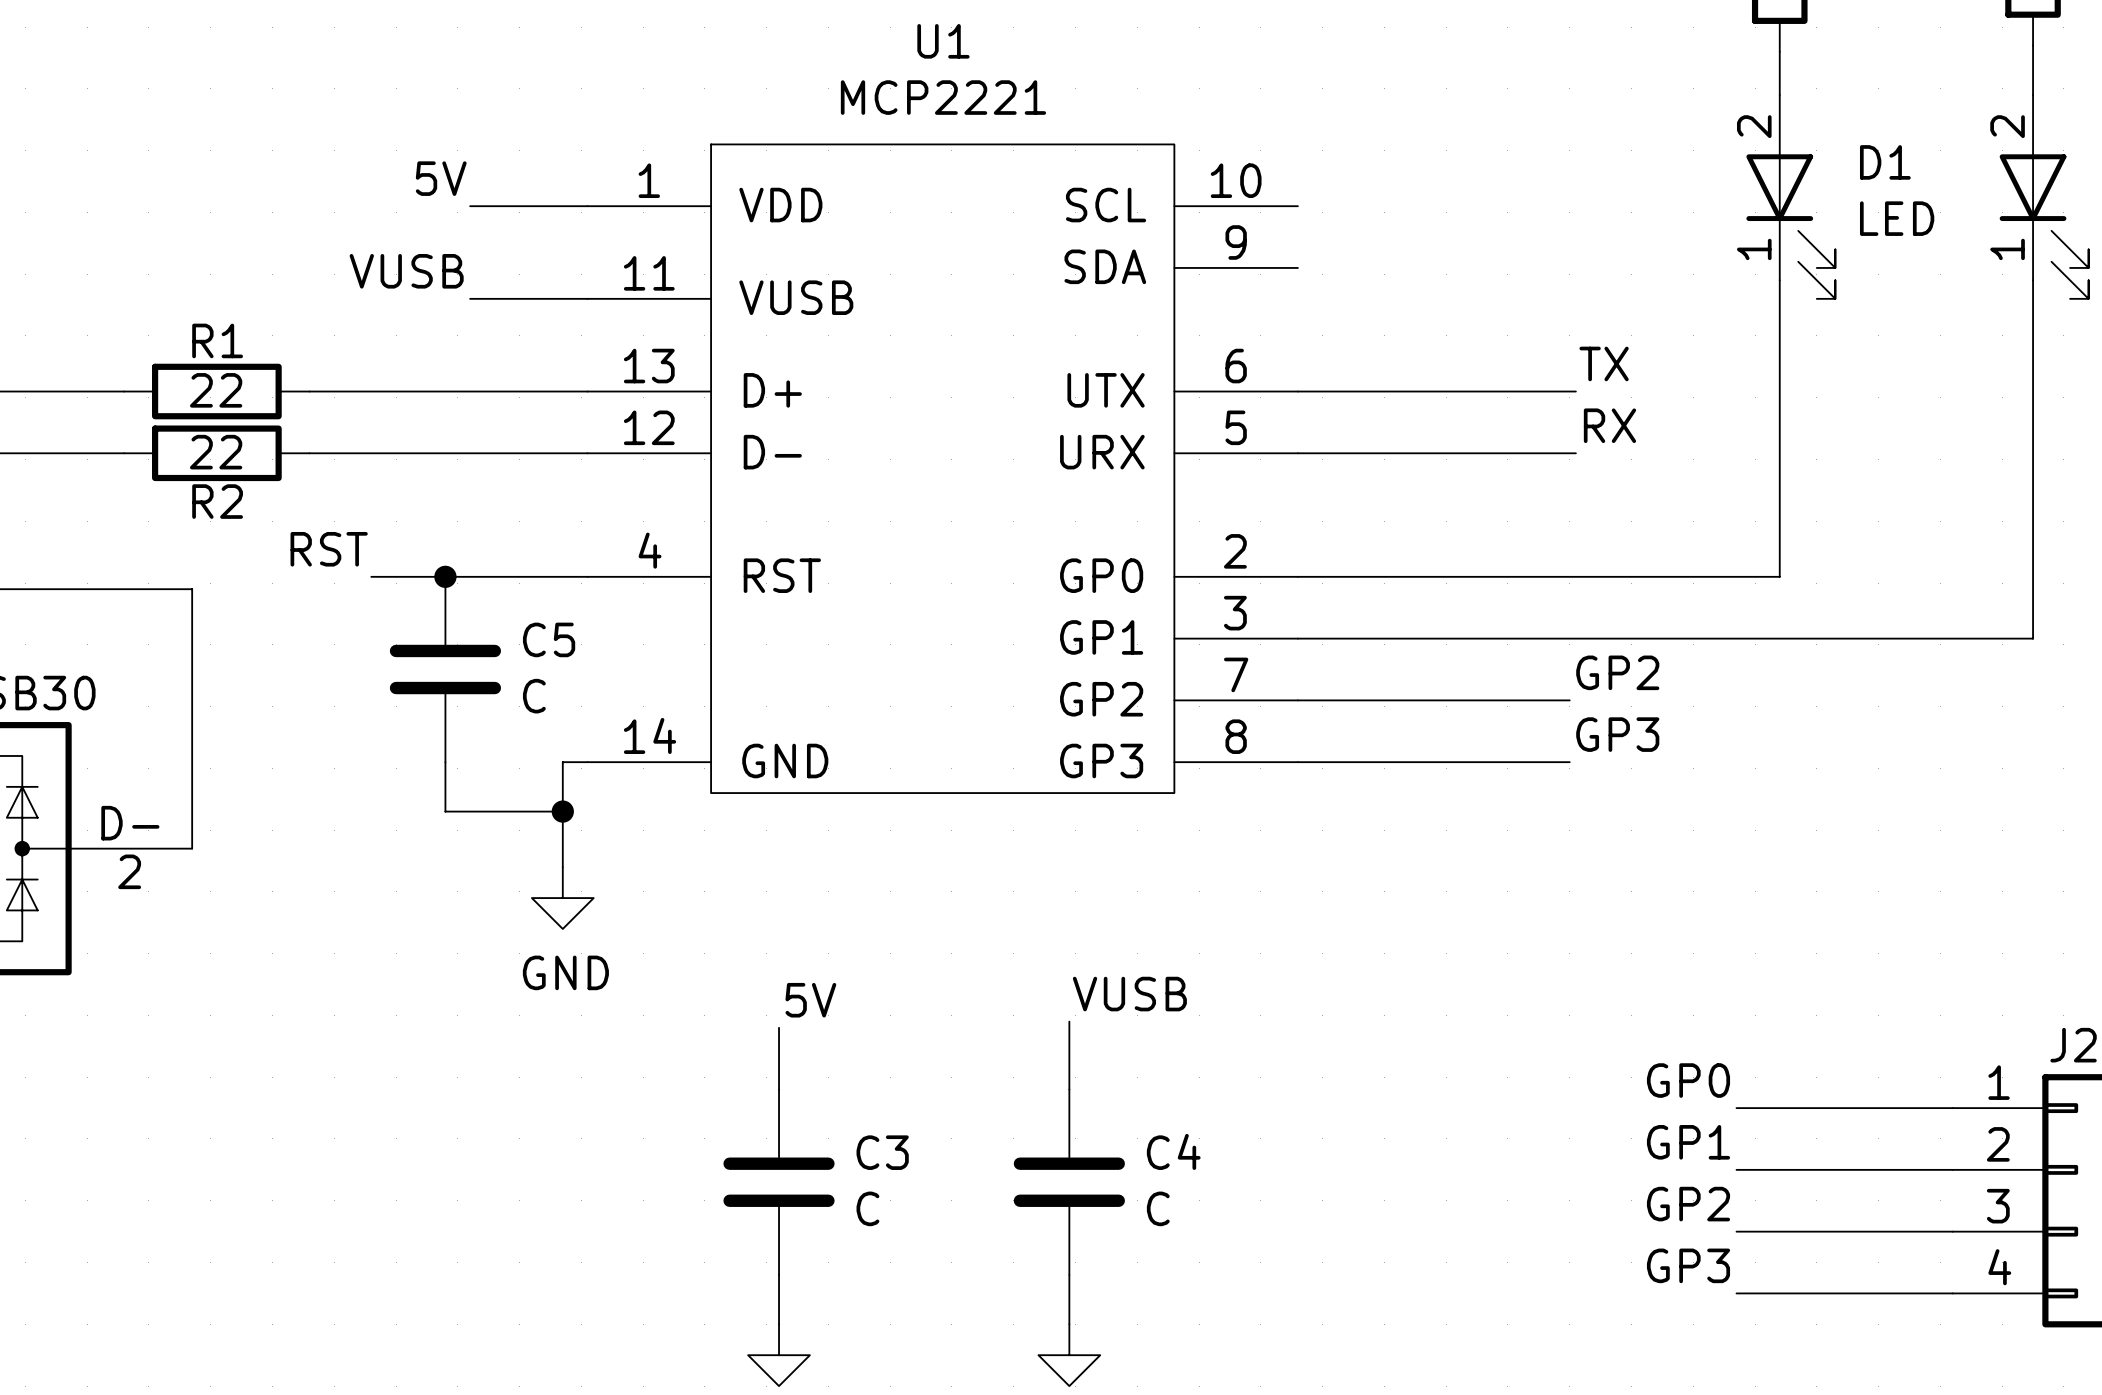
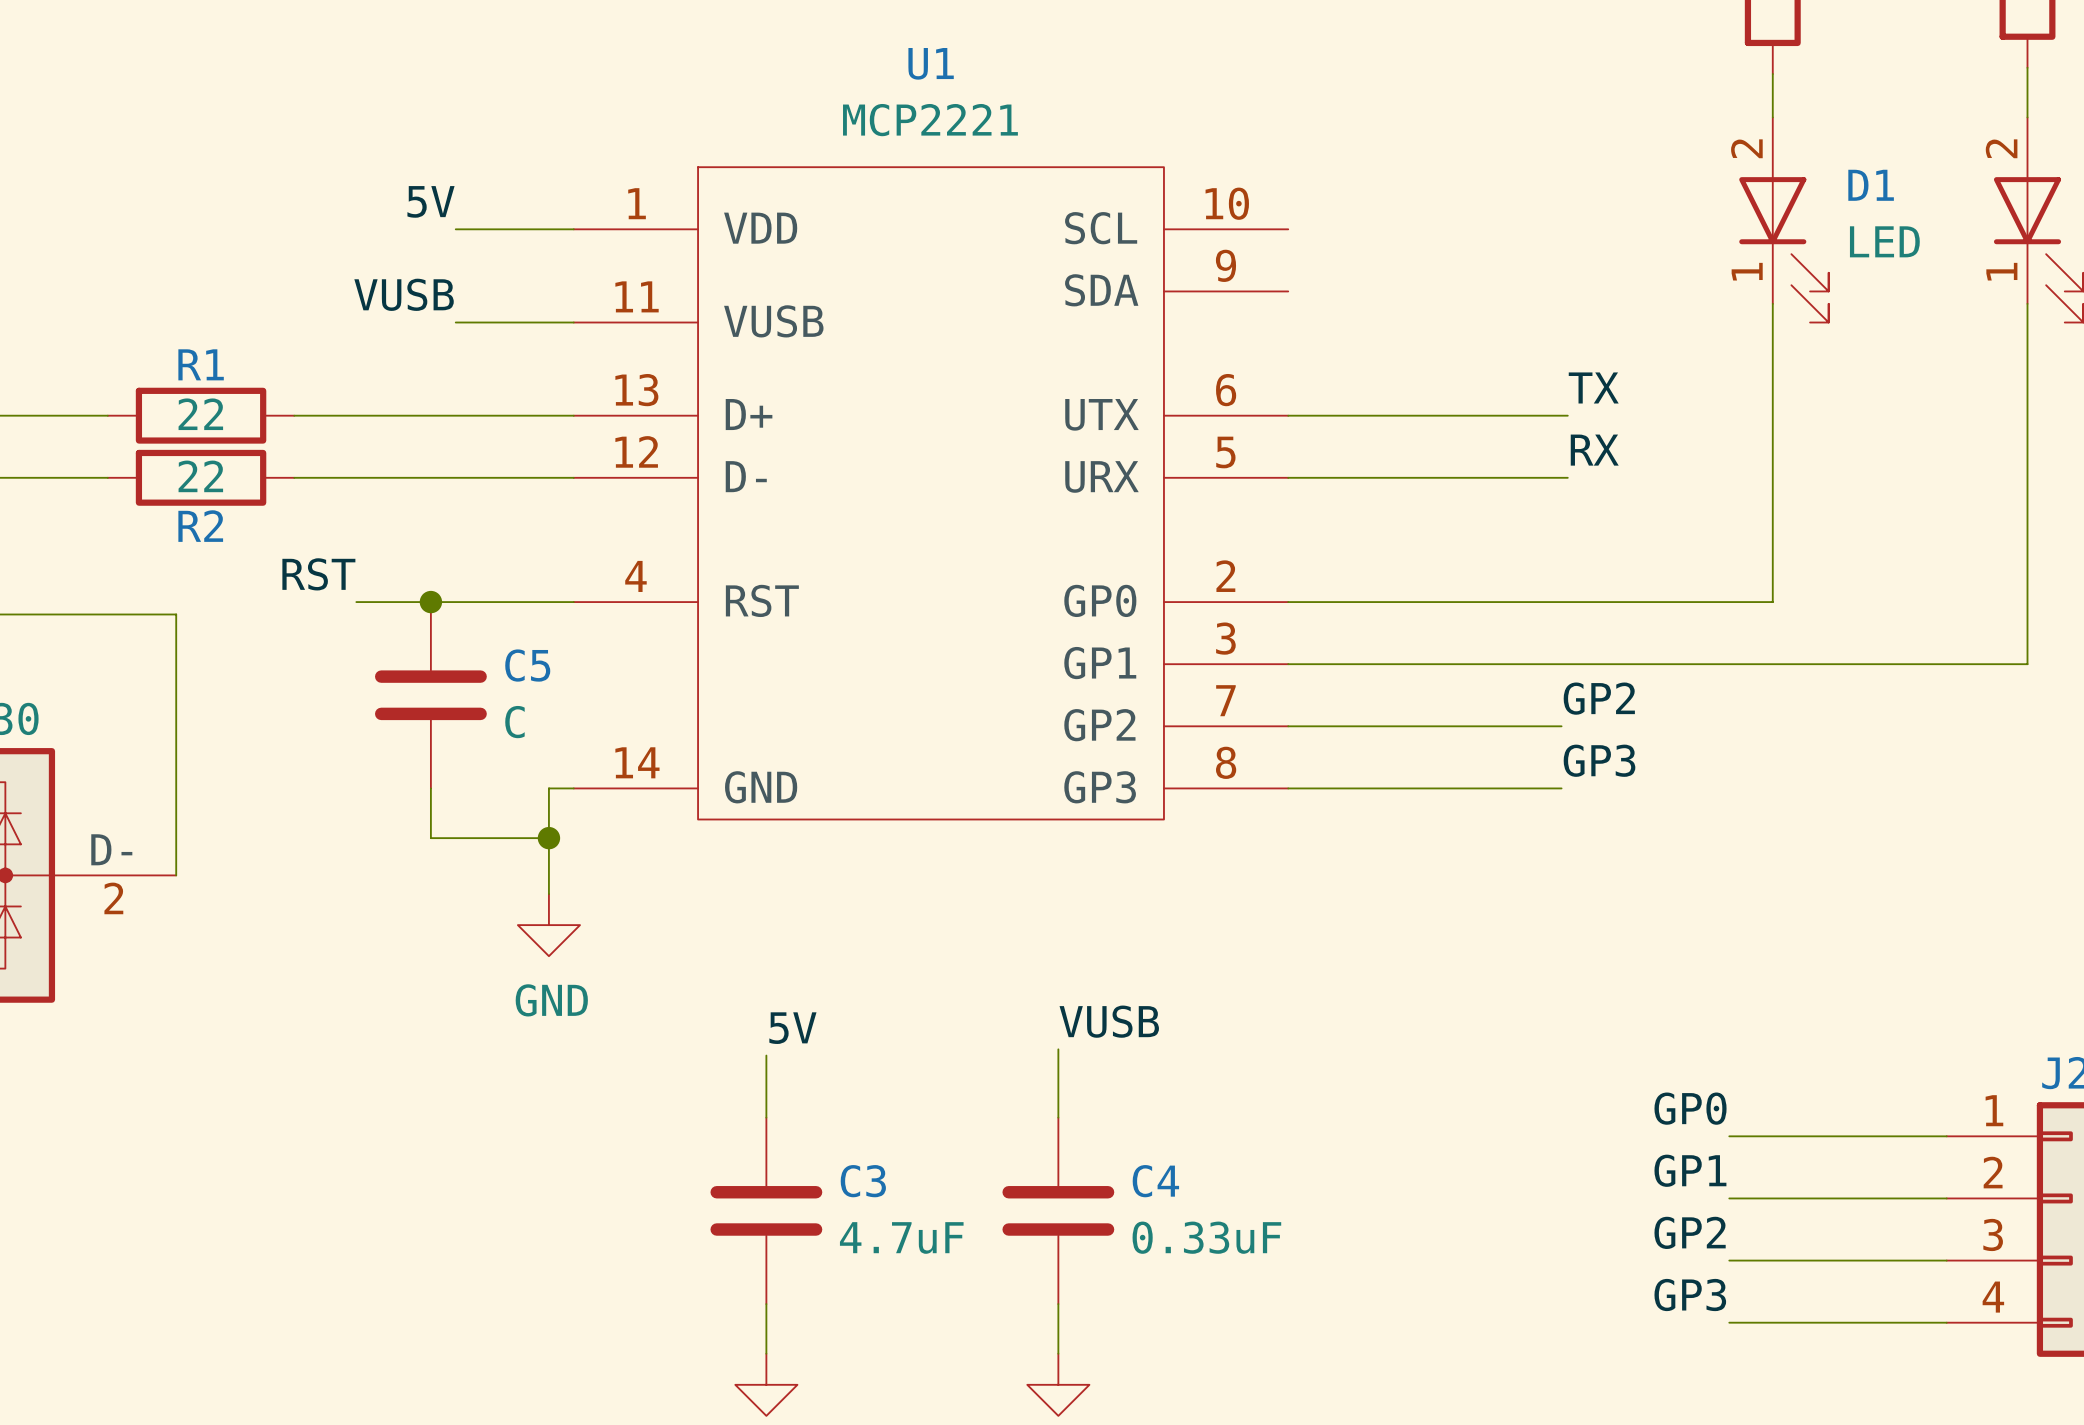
C3 value: C (867, 1208) -> 4.7uF (901, 1237)
C4 value: C (1158, 1208) -> 0.33uF (1206, 1237)

